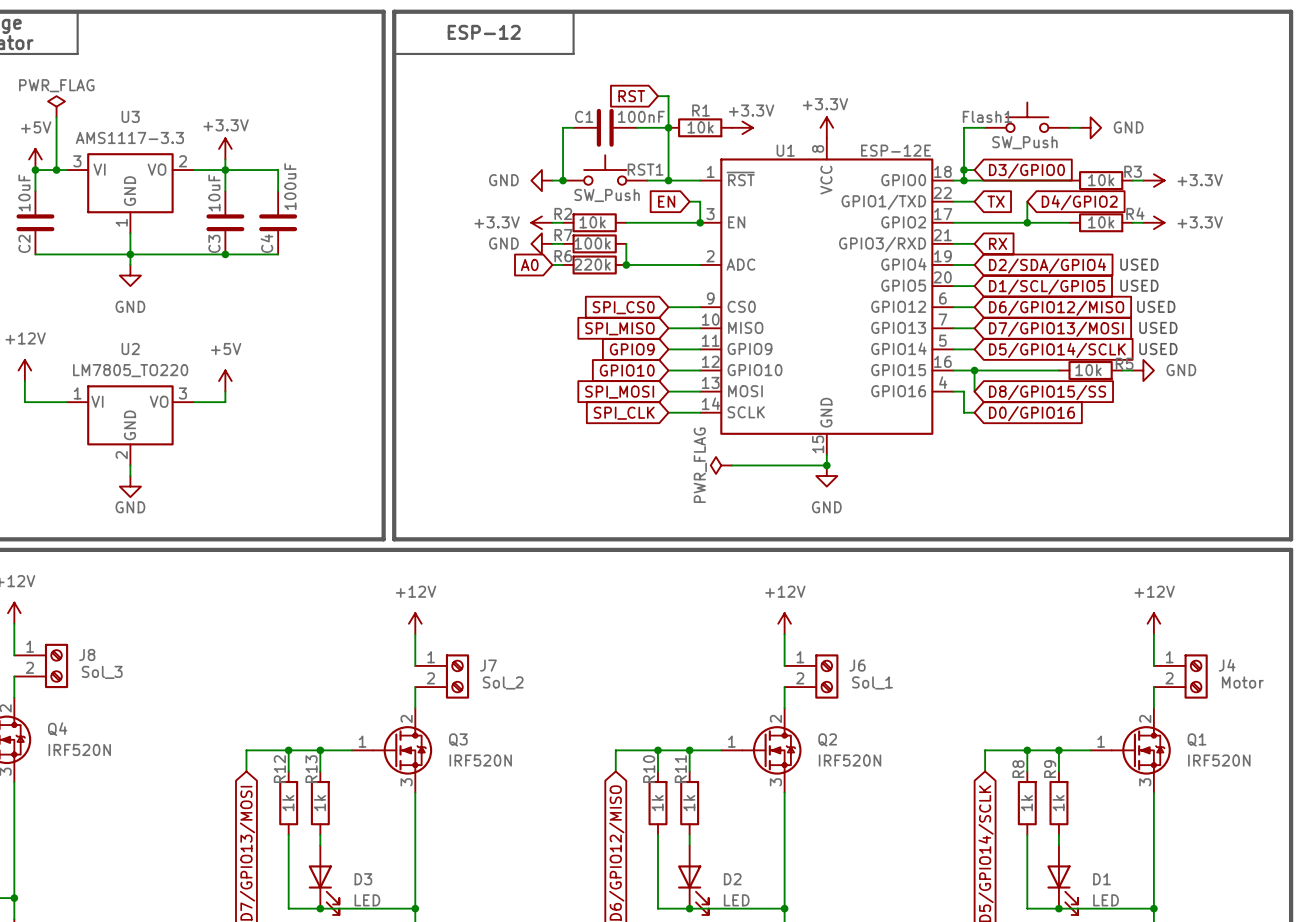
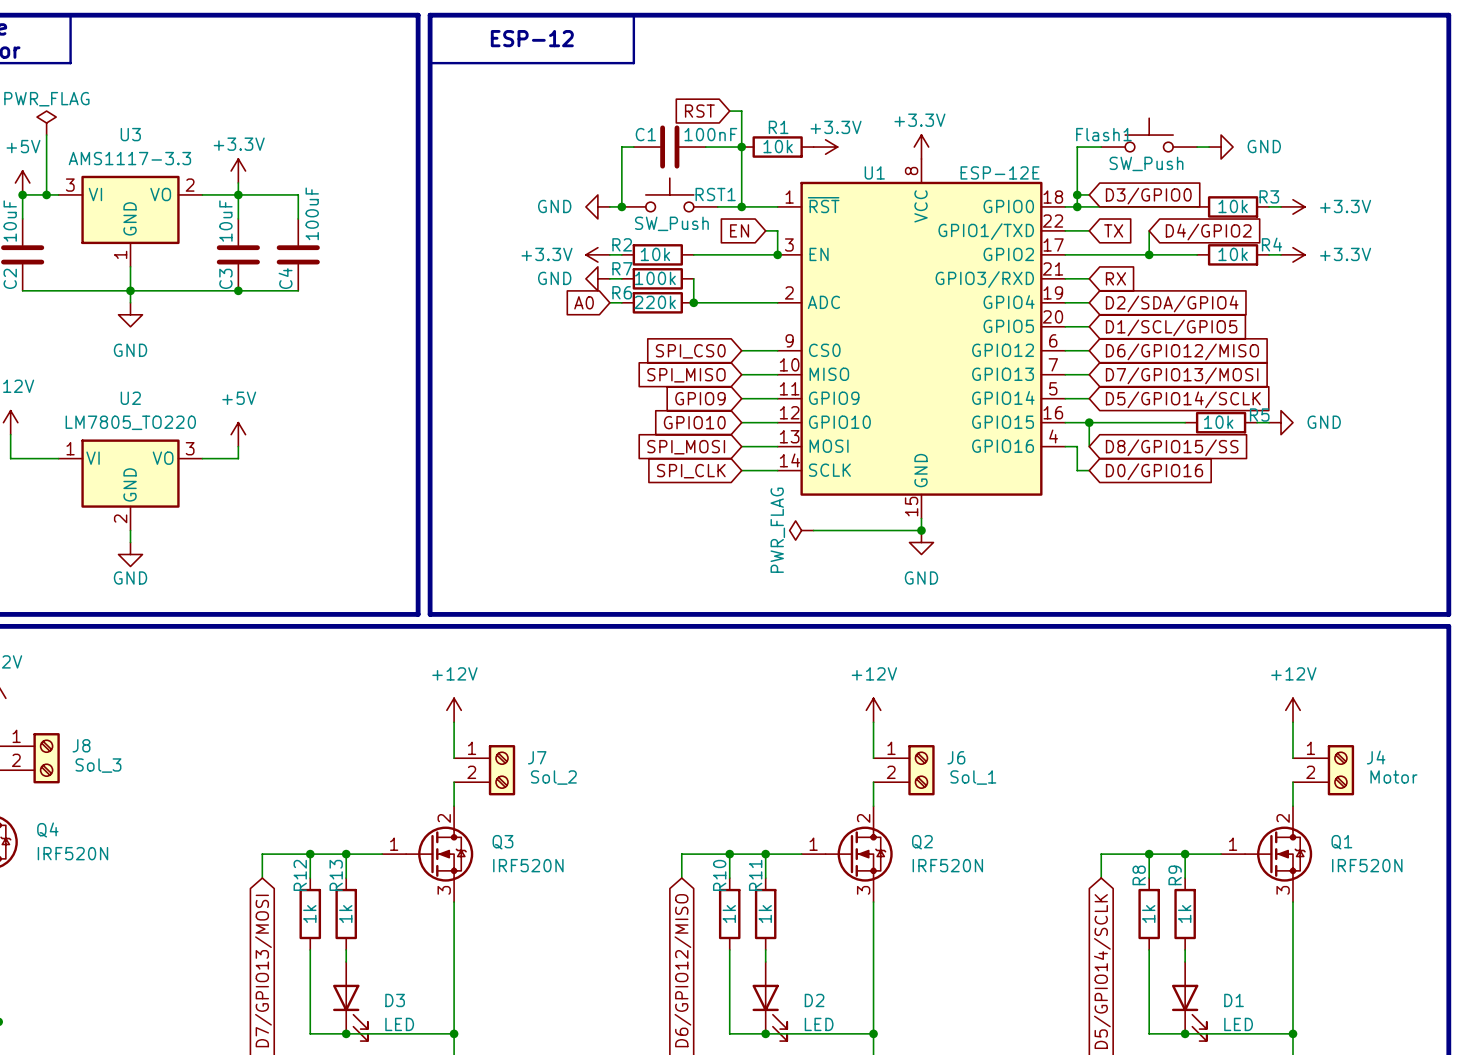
text: USED (1139, 264) -> none
text: USED (1139, 285) -> none
text: USED (1156, 306) -> none
text: USED (1158, 327) -> none
text: USED (1158, 349) -> none

